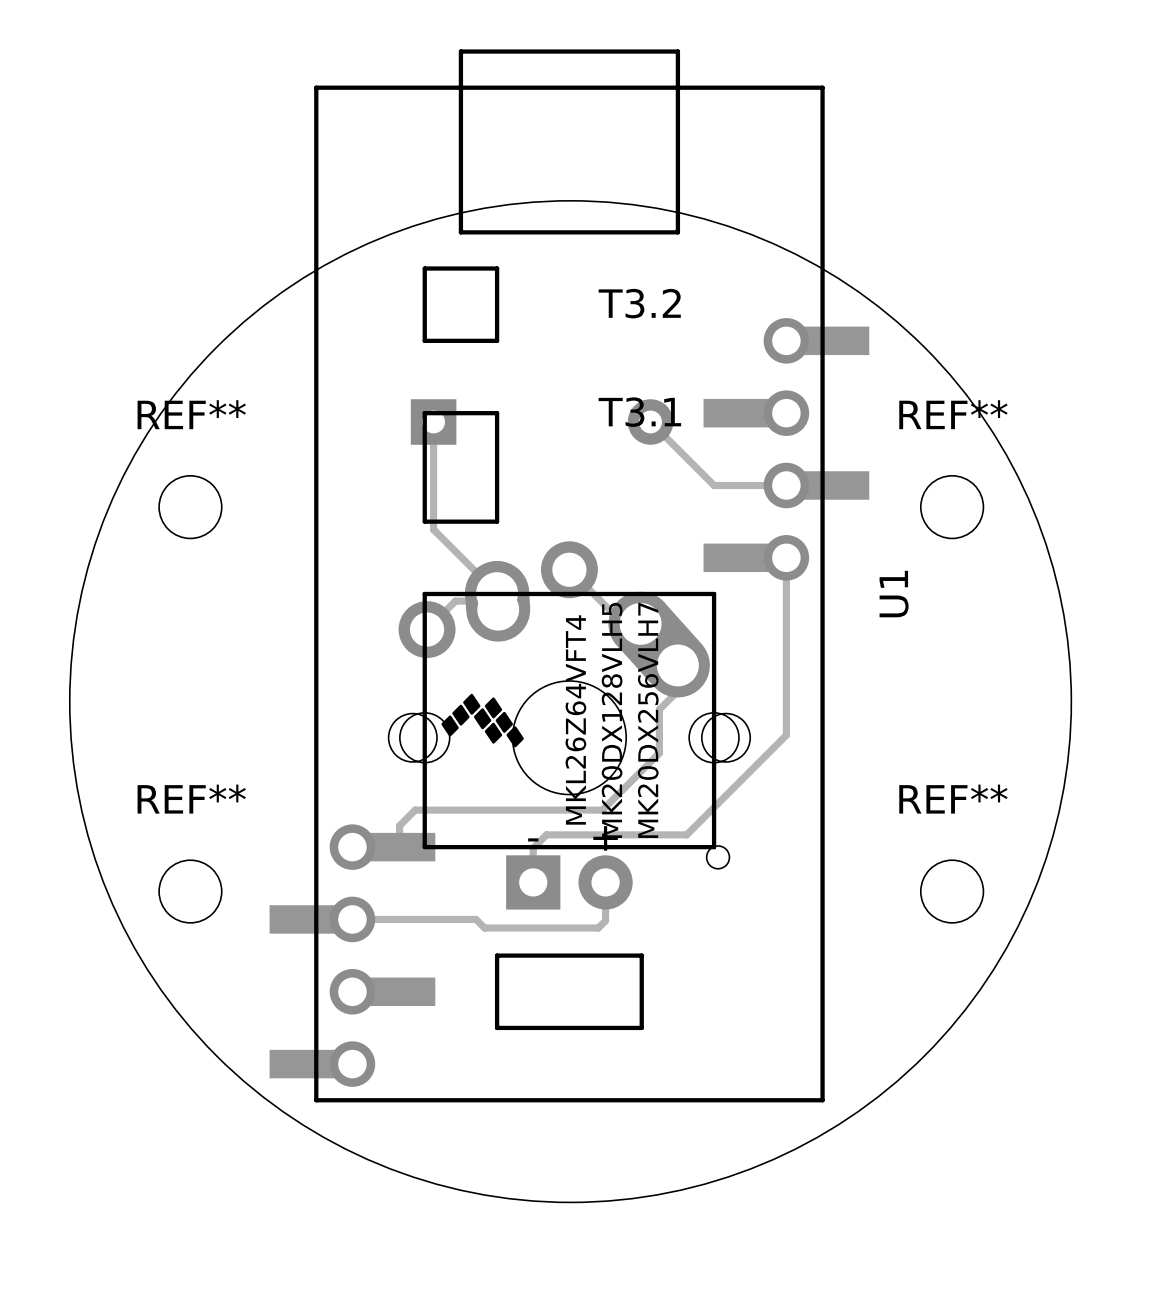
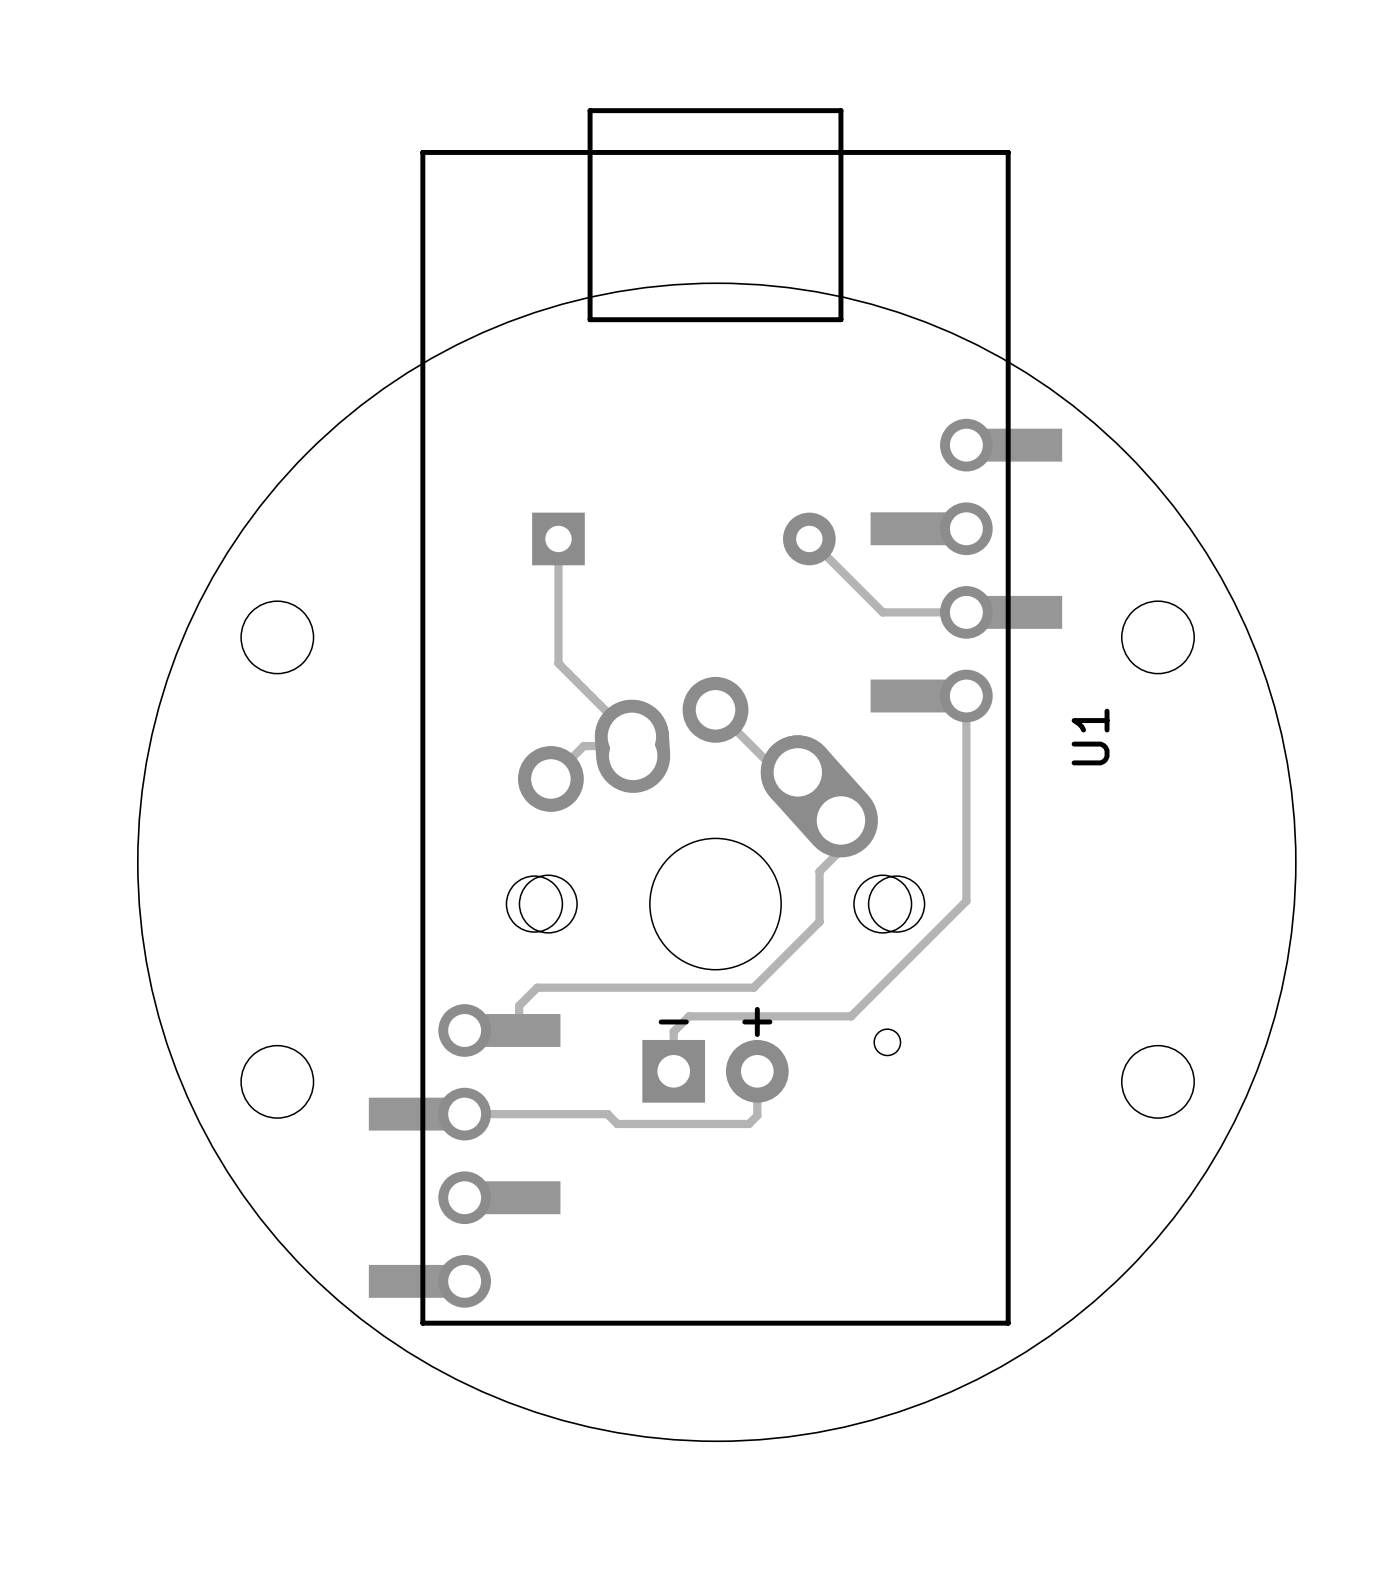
U1 footprint: [269, 49, 870, 1103] -> [368, 108, 1063, 1326]
REF** name: REF** (191, 414) -> none
REF** name: REF** (953, 414) -> none
REF** name: REF** (191, 799) -> none
REF** name: REF** (953, 799) -> none

